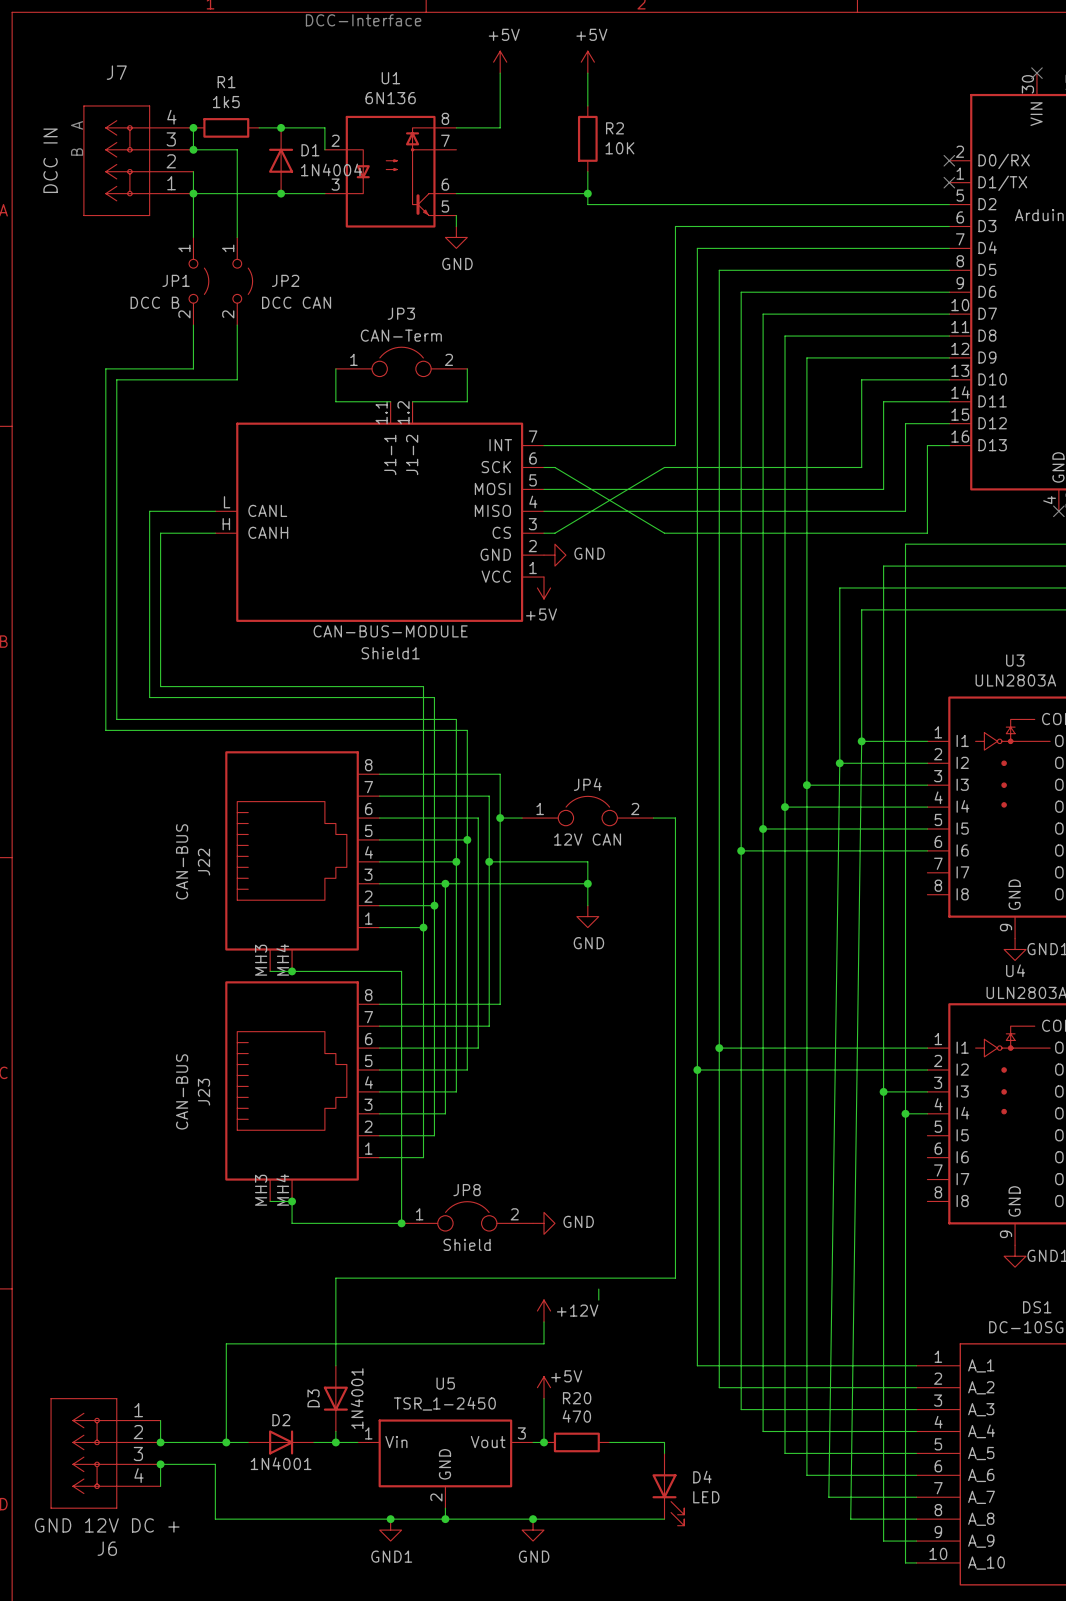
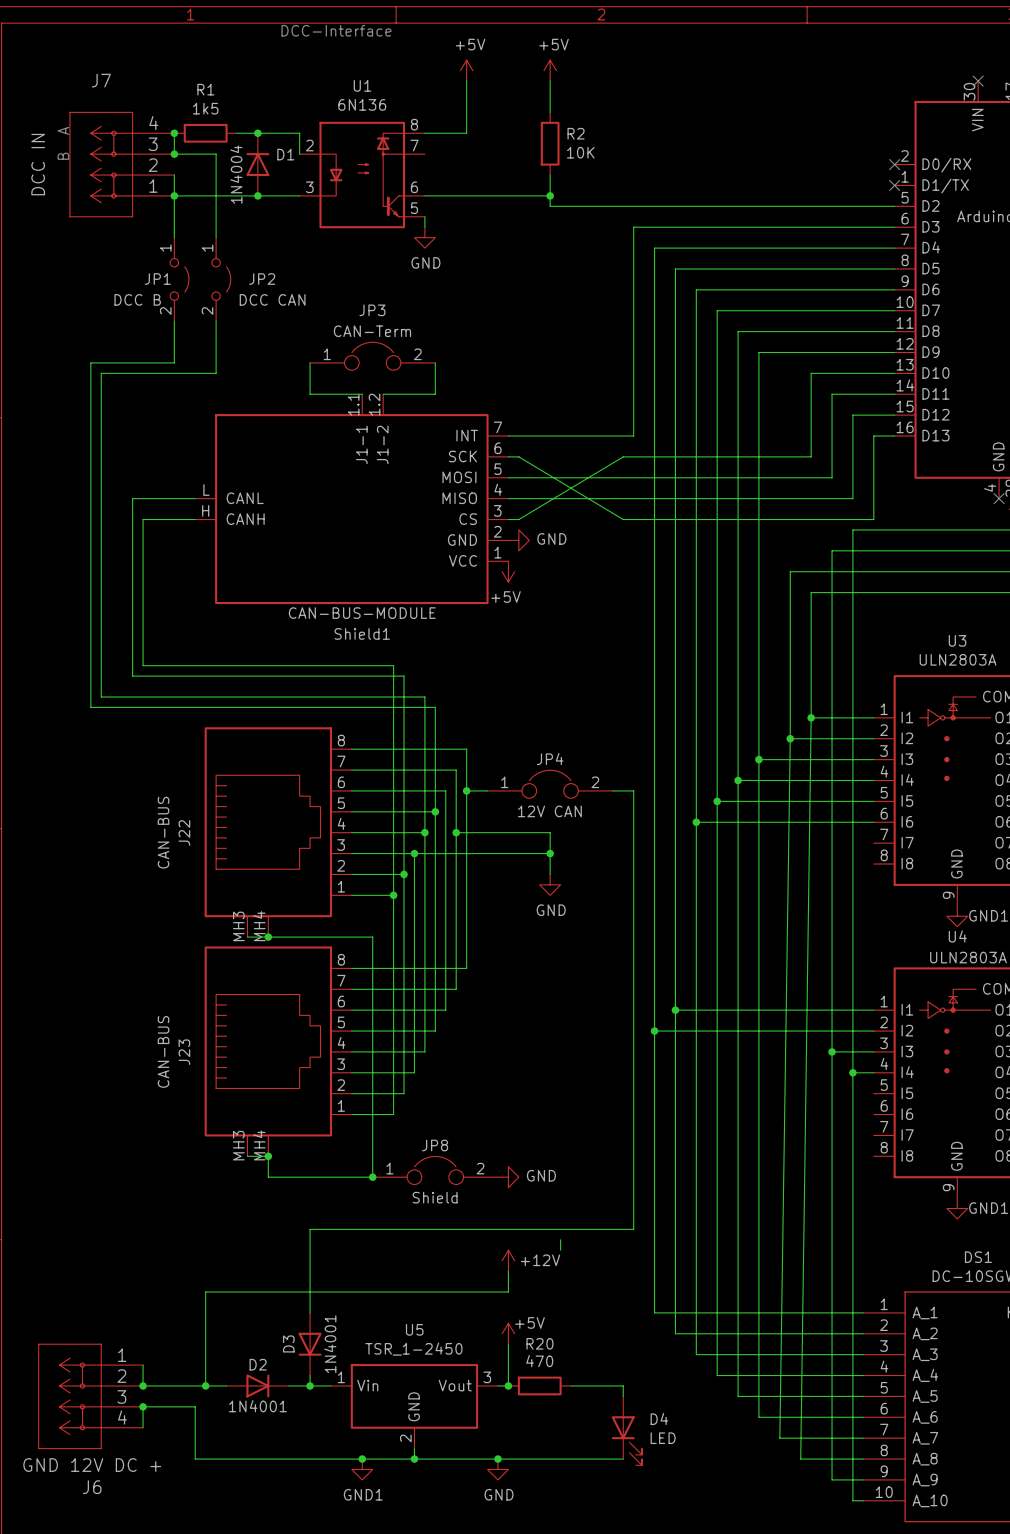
D1 value rotation: 0° (331, 169) -> 90° counterclockwise (236, 174)
D1 value position: 1N4004 (331, 169) -> 1N4004 (236, 174)

